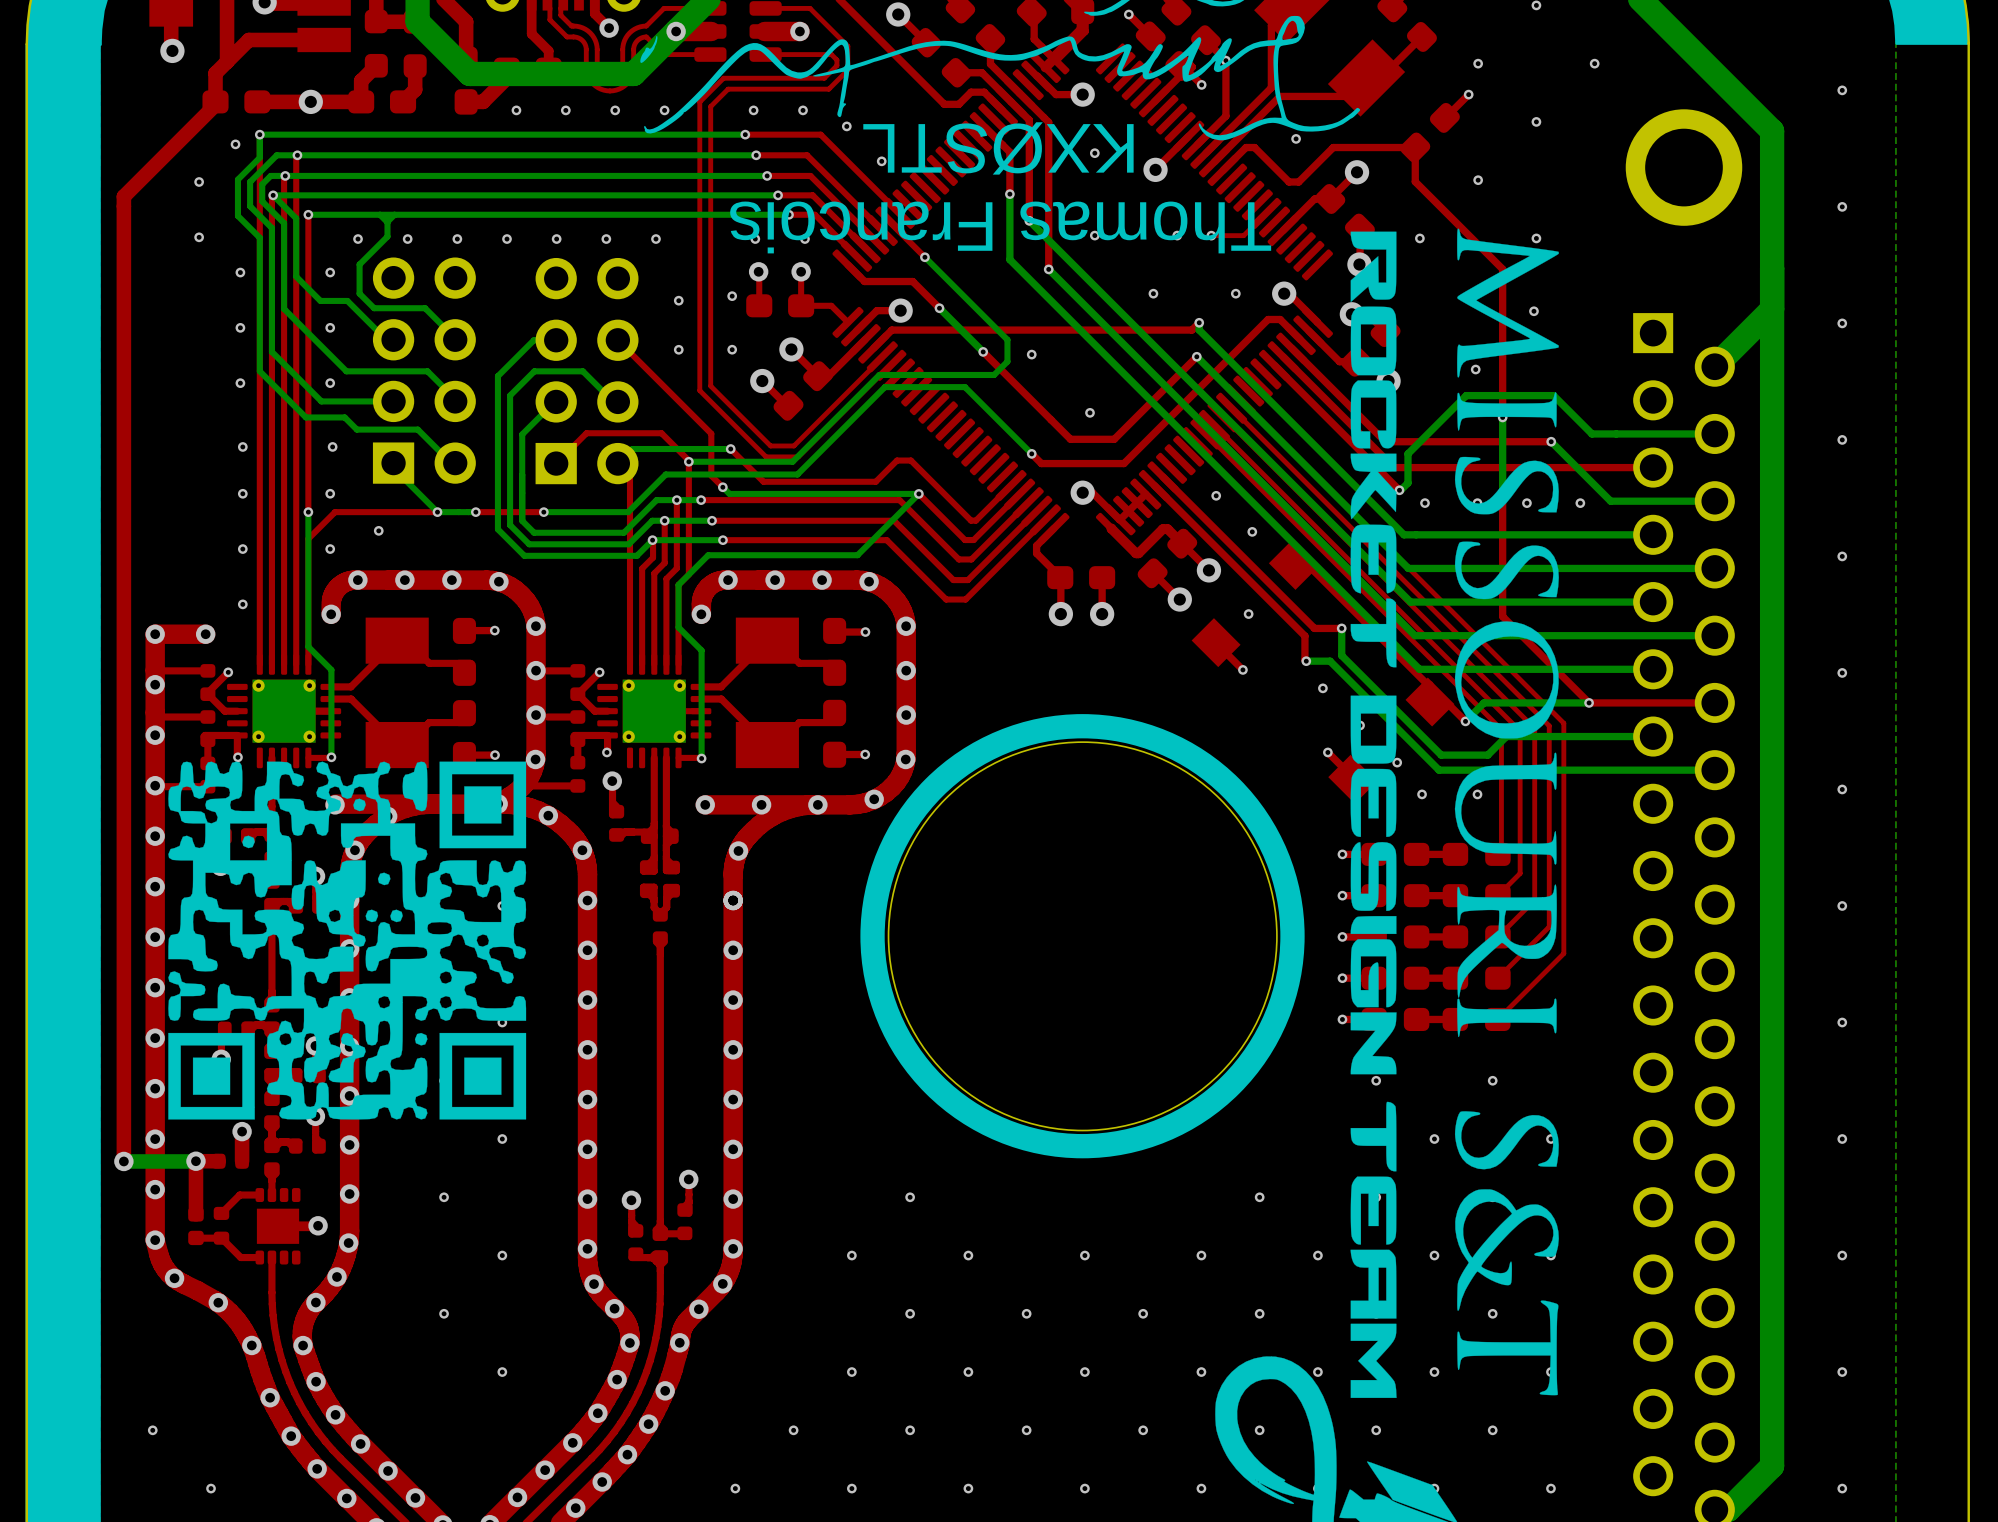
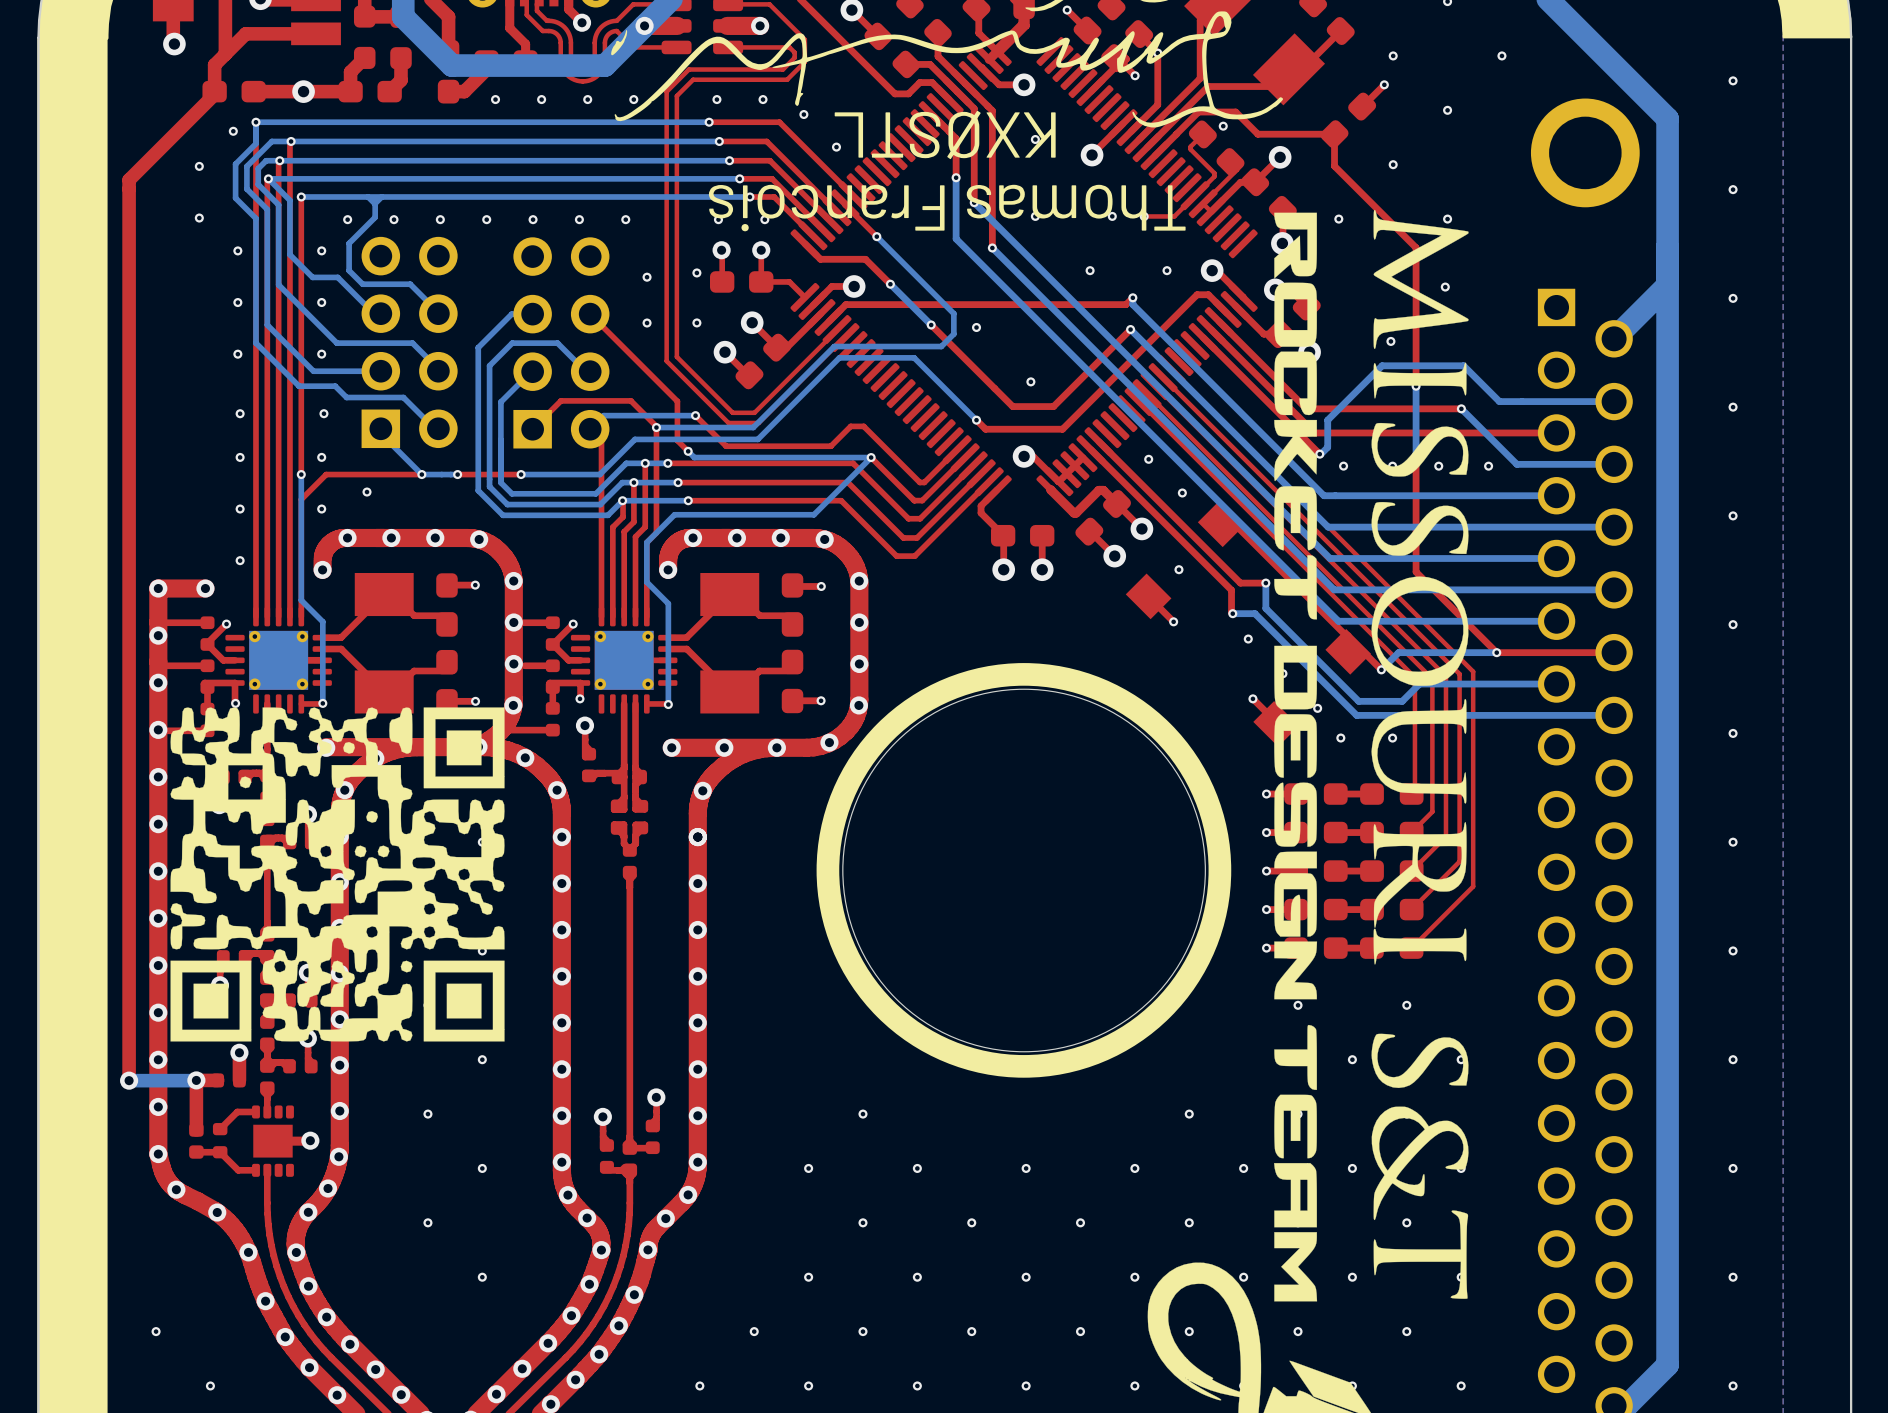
top track: none -> (1202, 134) (1190, 146) (1190, 149) (1214, 173) (1214, 176) (1195, 195)
top track: (1333, 147) (1298, 181) (1289, 181) (1254, 147) (1246, 147) -> (1257, 134) (1235, 112) (1198, 112) (1176, 134)
part: none -> (1216, 148)
top track: none -> (1237, 168) (1203, 203) (1211, 211)

